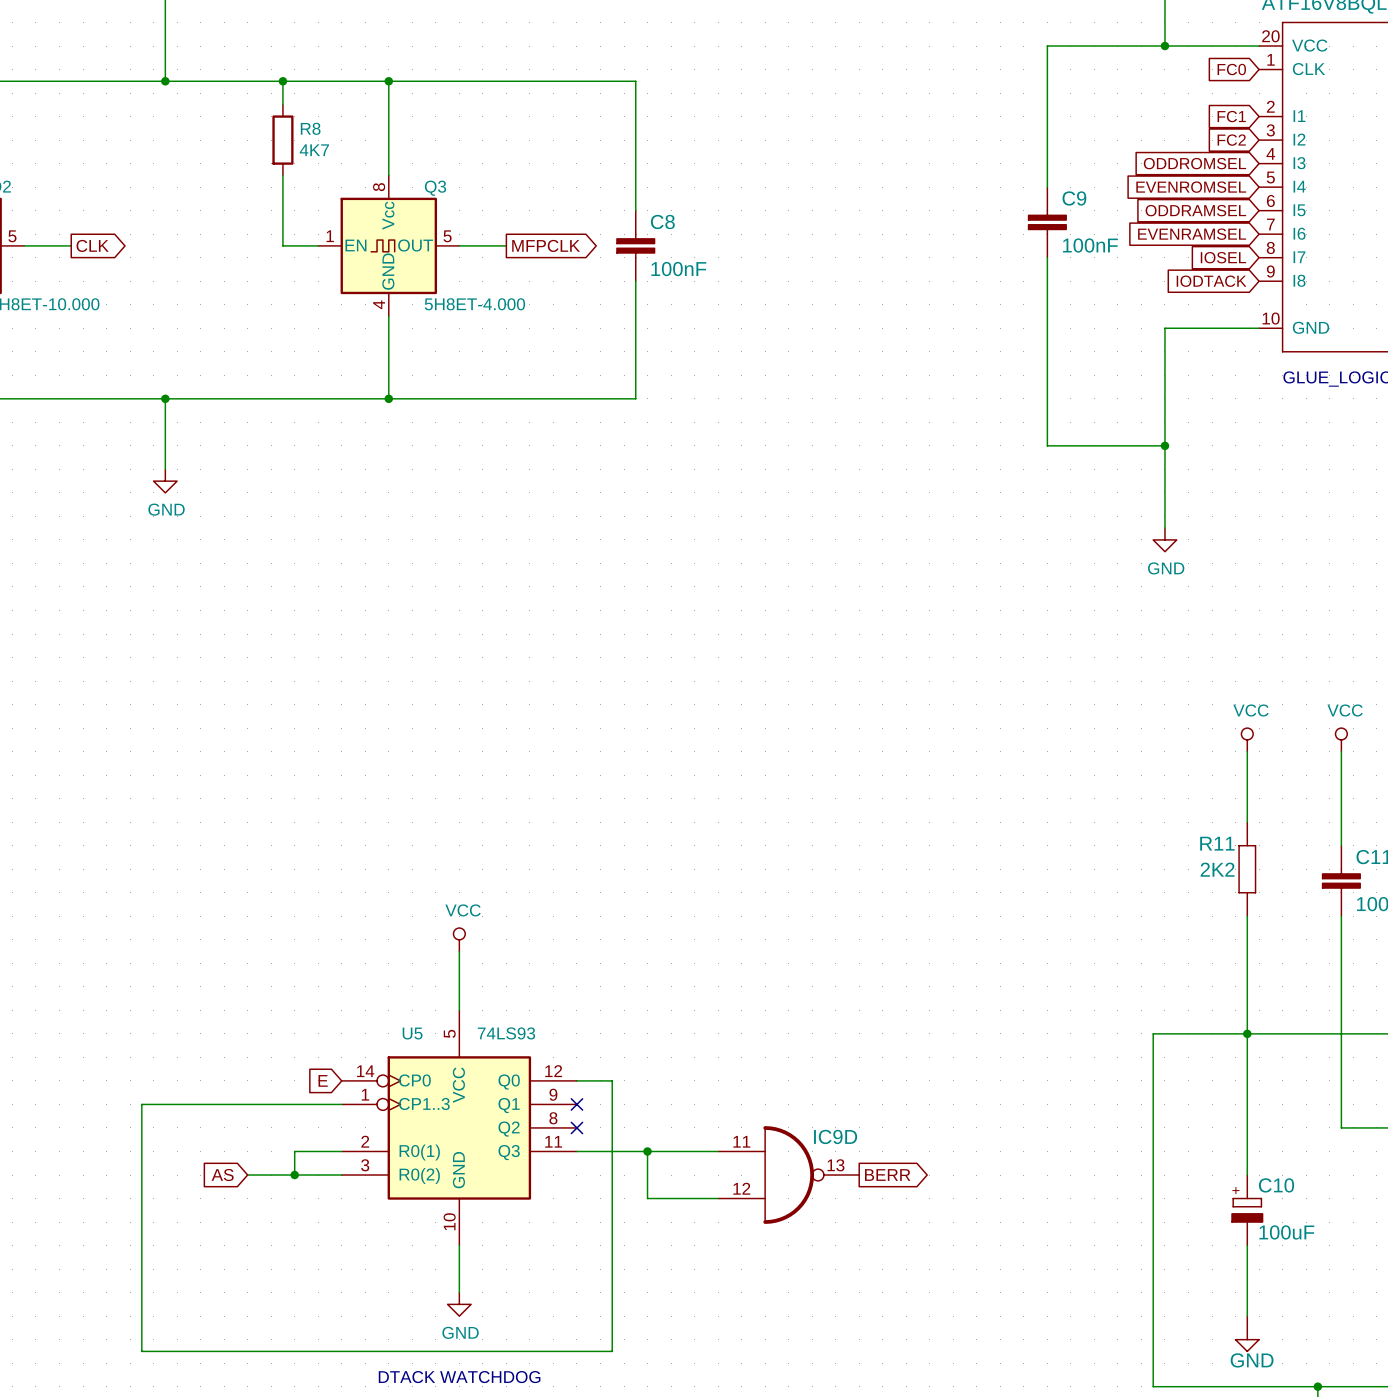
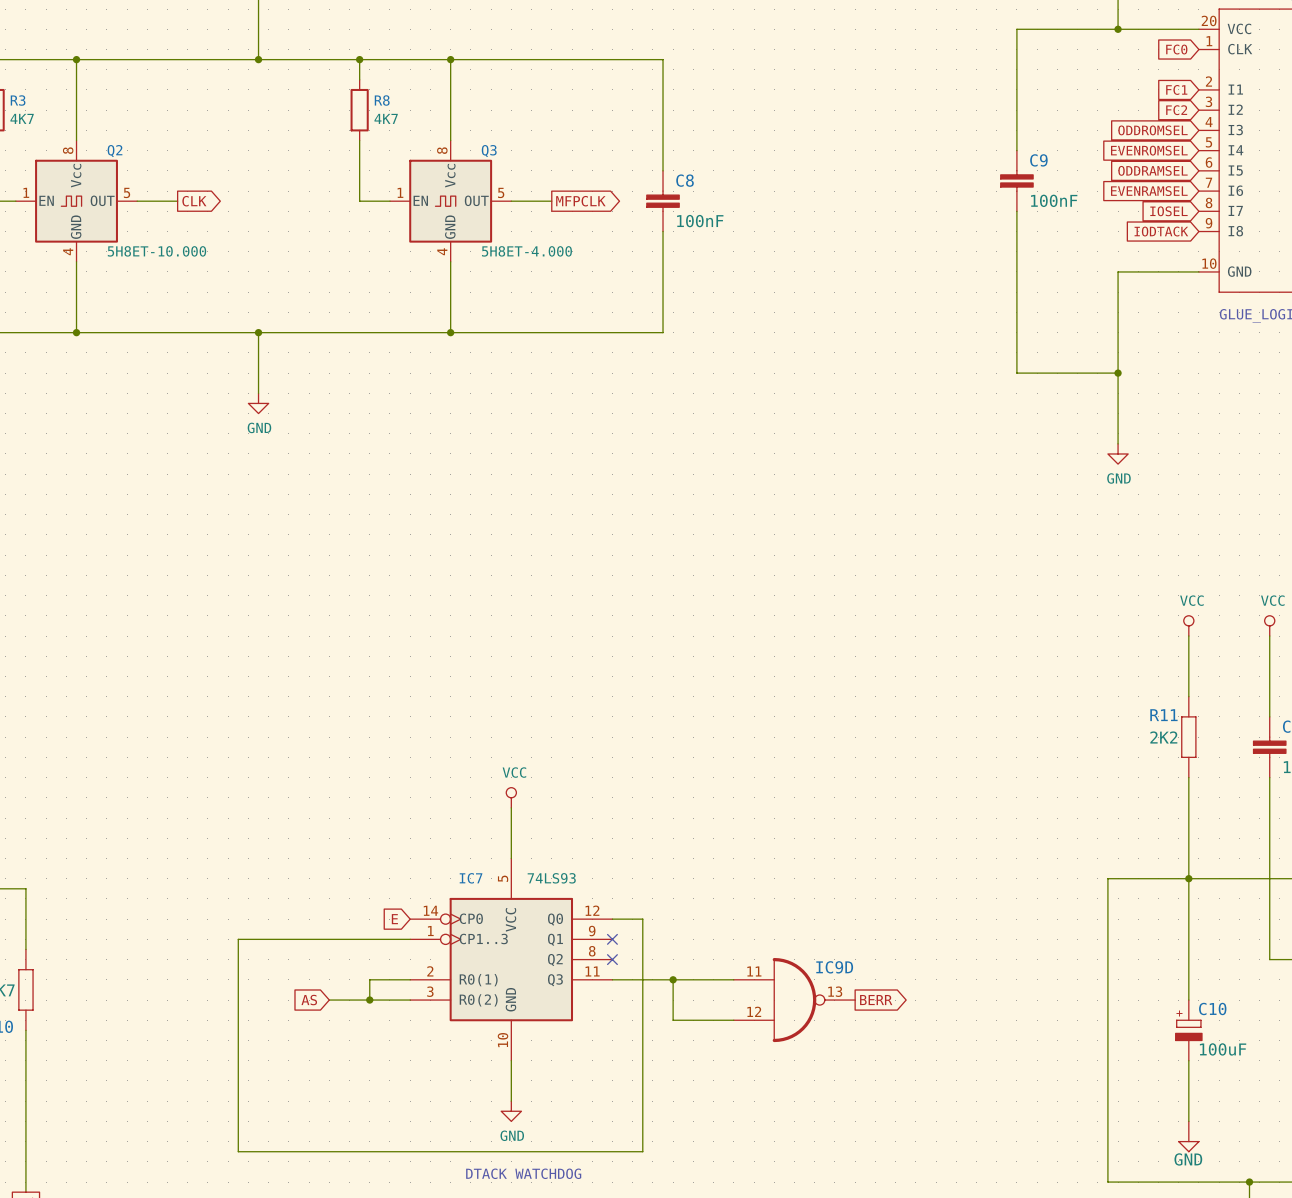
U5 name: U5 (412, 1033) -> IC7 (471, 878)

